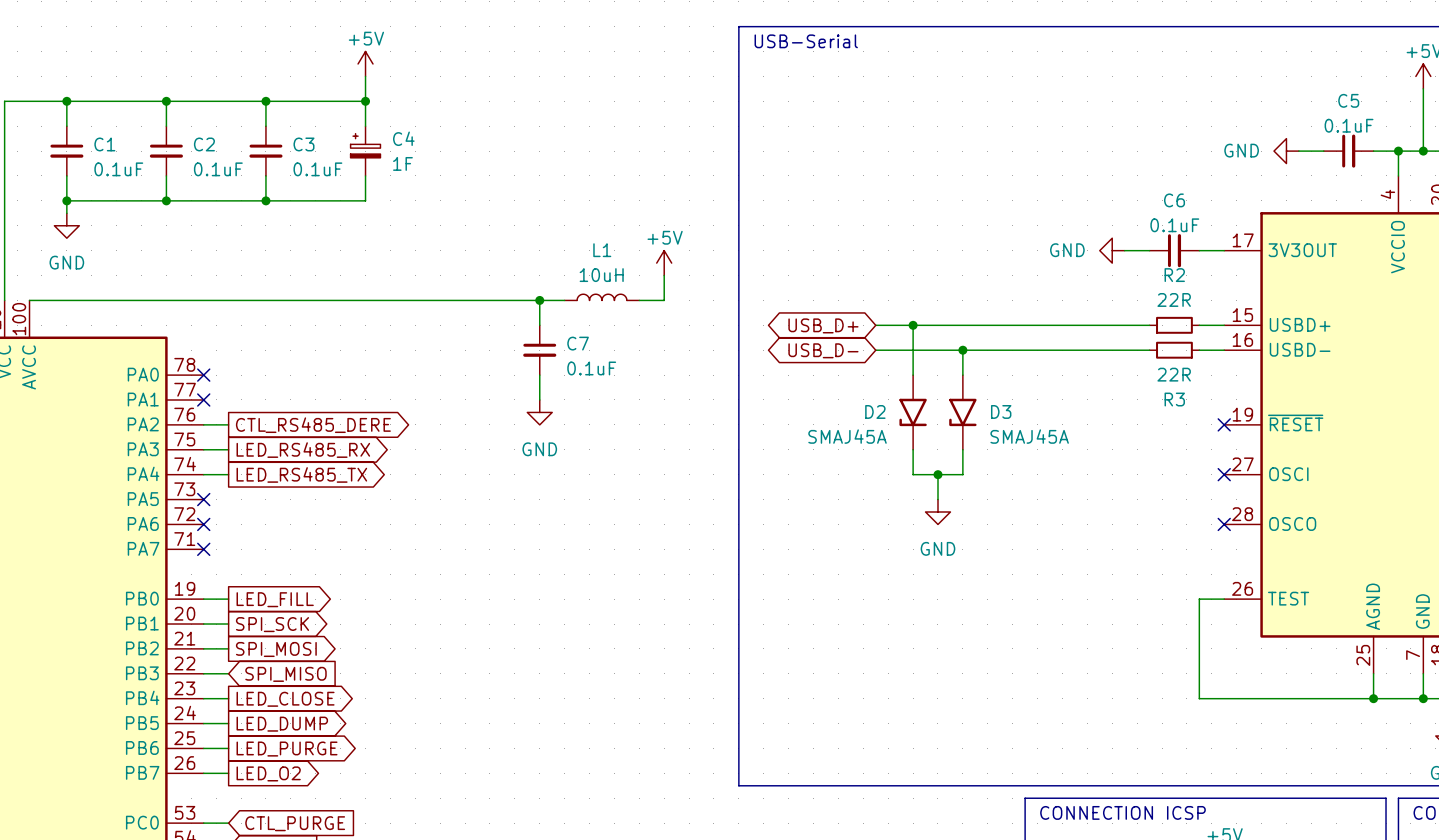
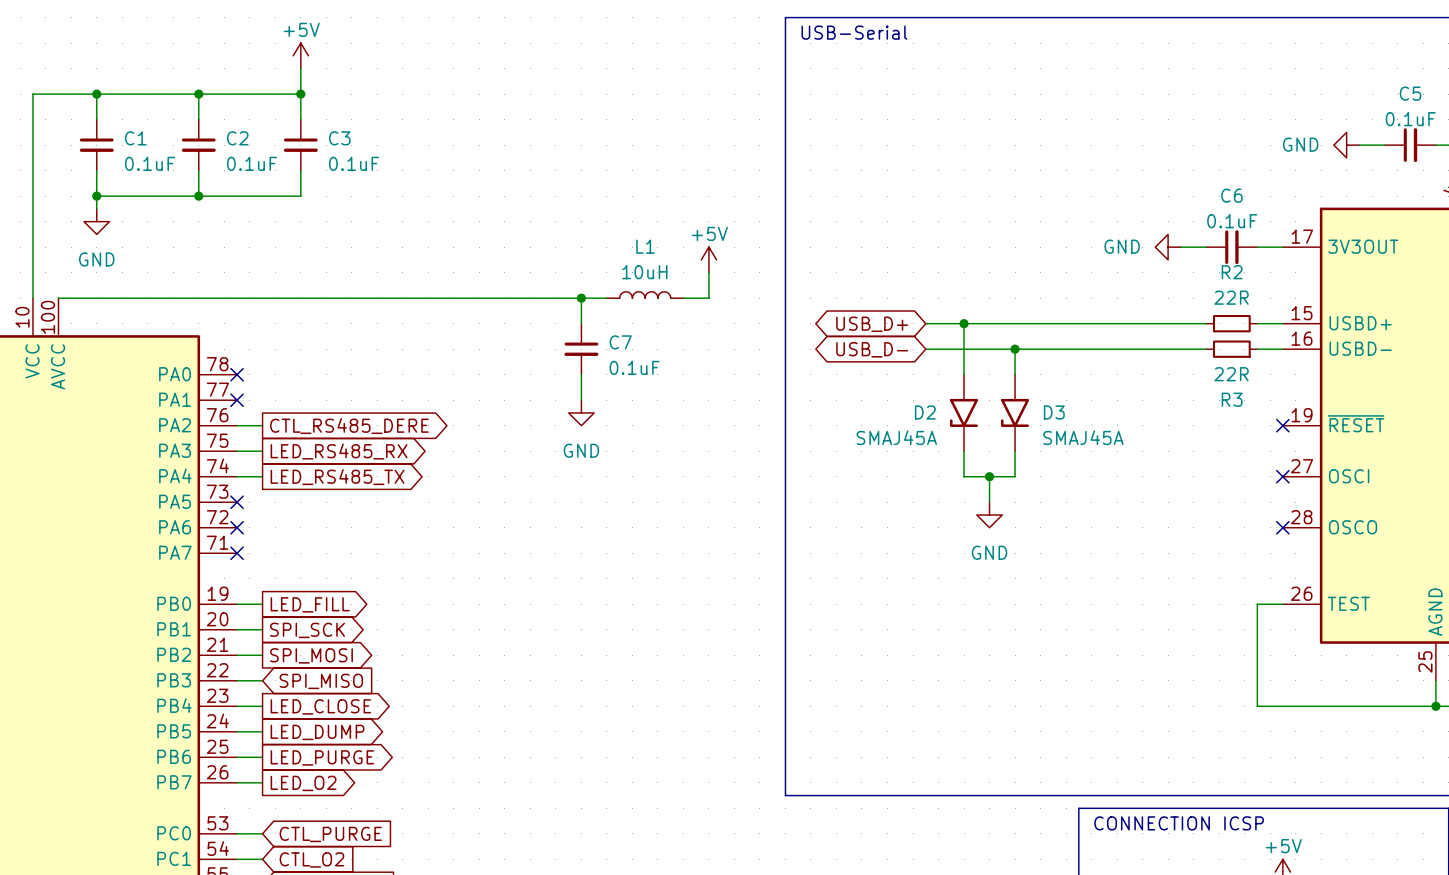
power symbol position: +5V (365, 63) -> +5V (300, 55)
wire: (365, 76) (365, 126) -> none
wire: (265, 101) (365, 101) -> (300, 94) (300, 68)
junction: (365, 101) -> none
C4: 1F (365, 151) -> none
wire: (365, 175) (365, 200) (265, 200) -> none
junction: (265, 200) -> none

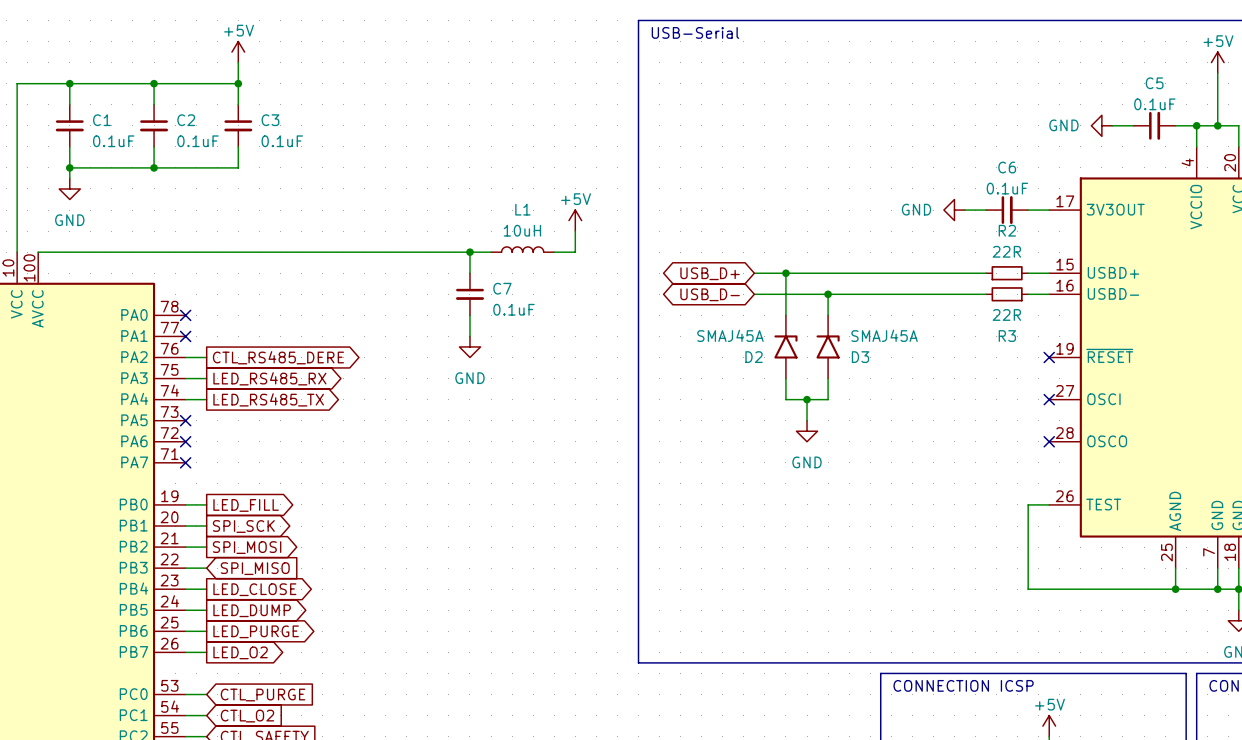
D2 rotation: 0° (964, 412) -> 180° (785, 346)
D3 rotation: 0° (1015, 412) -> 180° (828, 346)
D2 value position: SMAJ45A (896, 437) -> SMAJ45A (730, 335)
D3 value position: SMAJ45A (1083, 437) -> SMAJ45A (884, 335)

